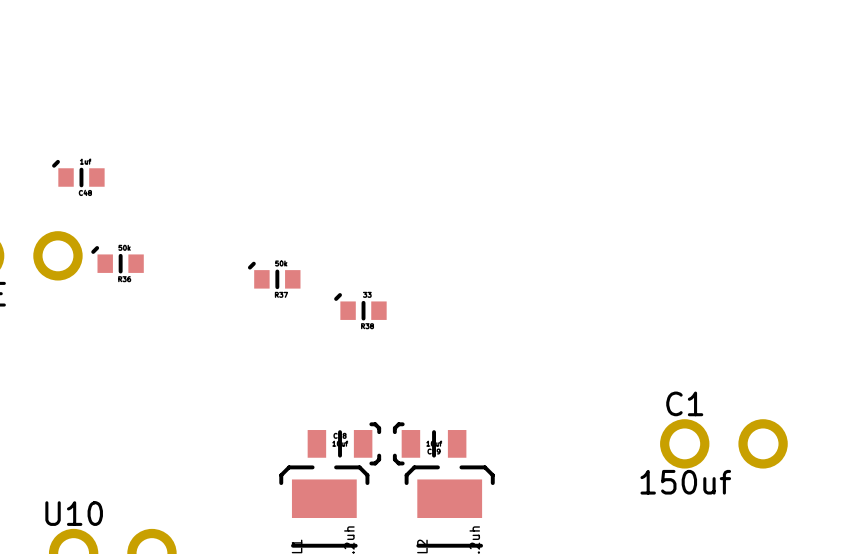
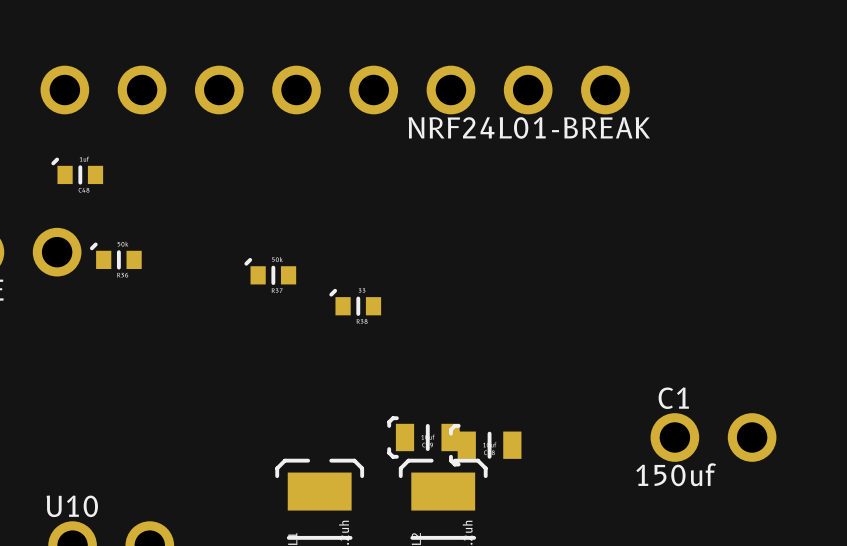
part: none -> NRF24L01-BREAK (335, 90)
part rotation: 0° (344, 443) -> 180° (485, 445)
part position: (344, 443) -> (485, 445)

